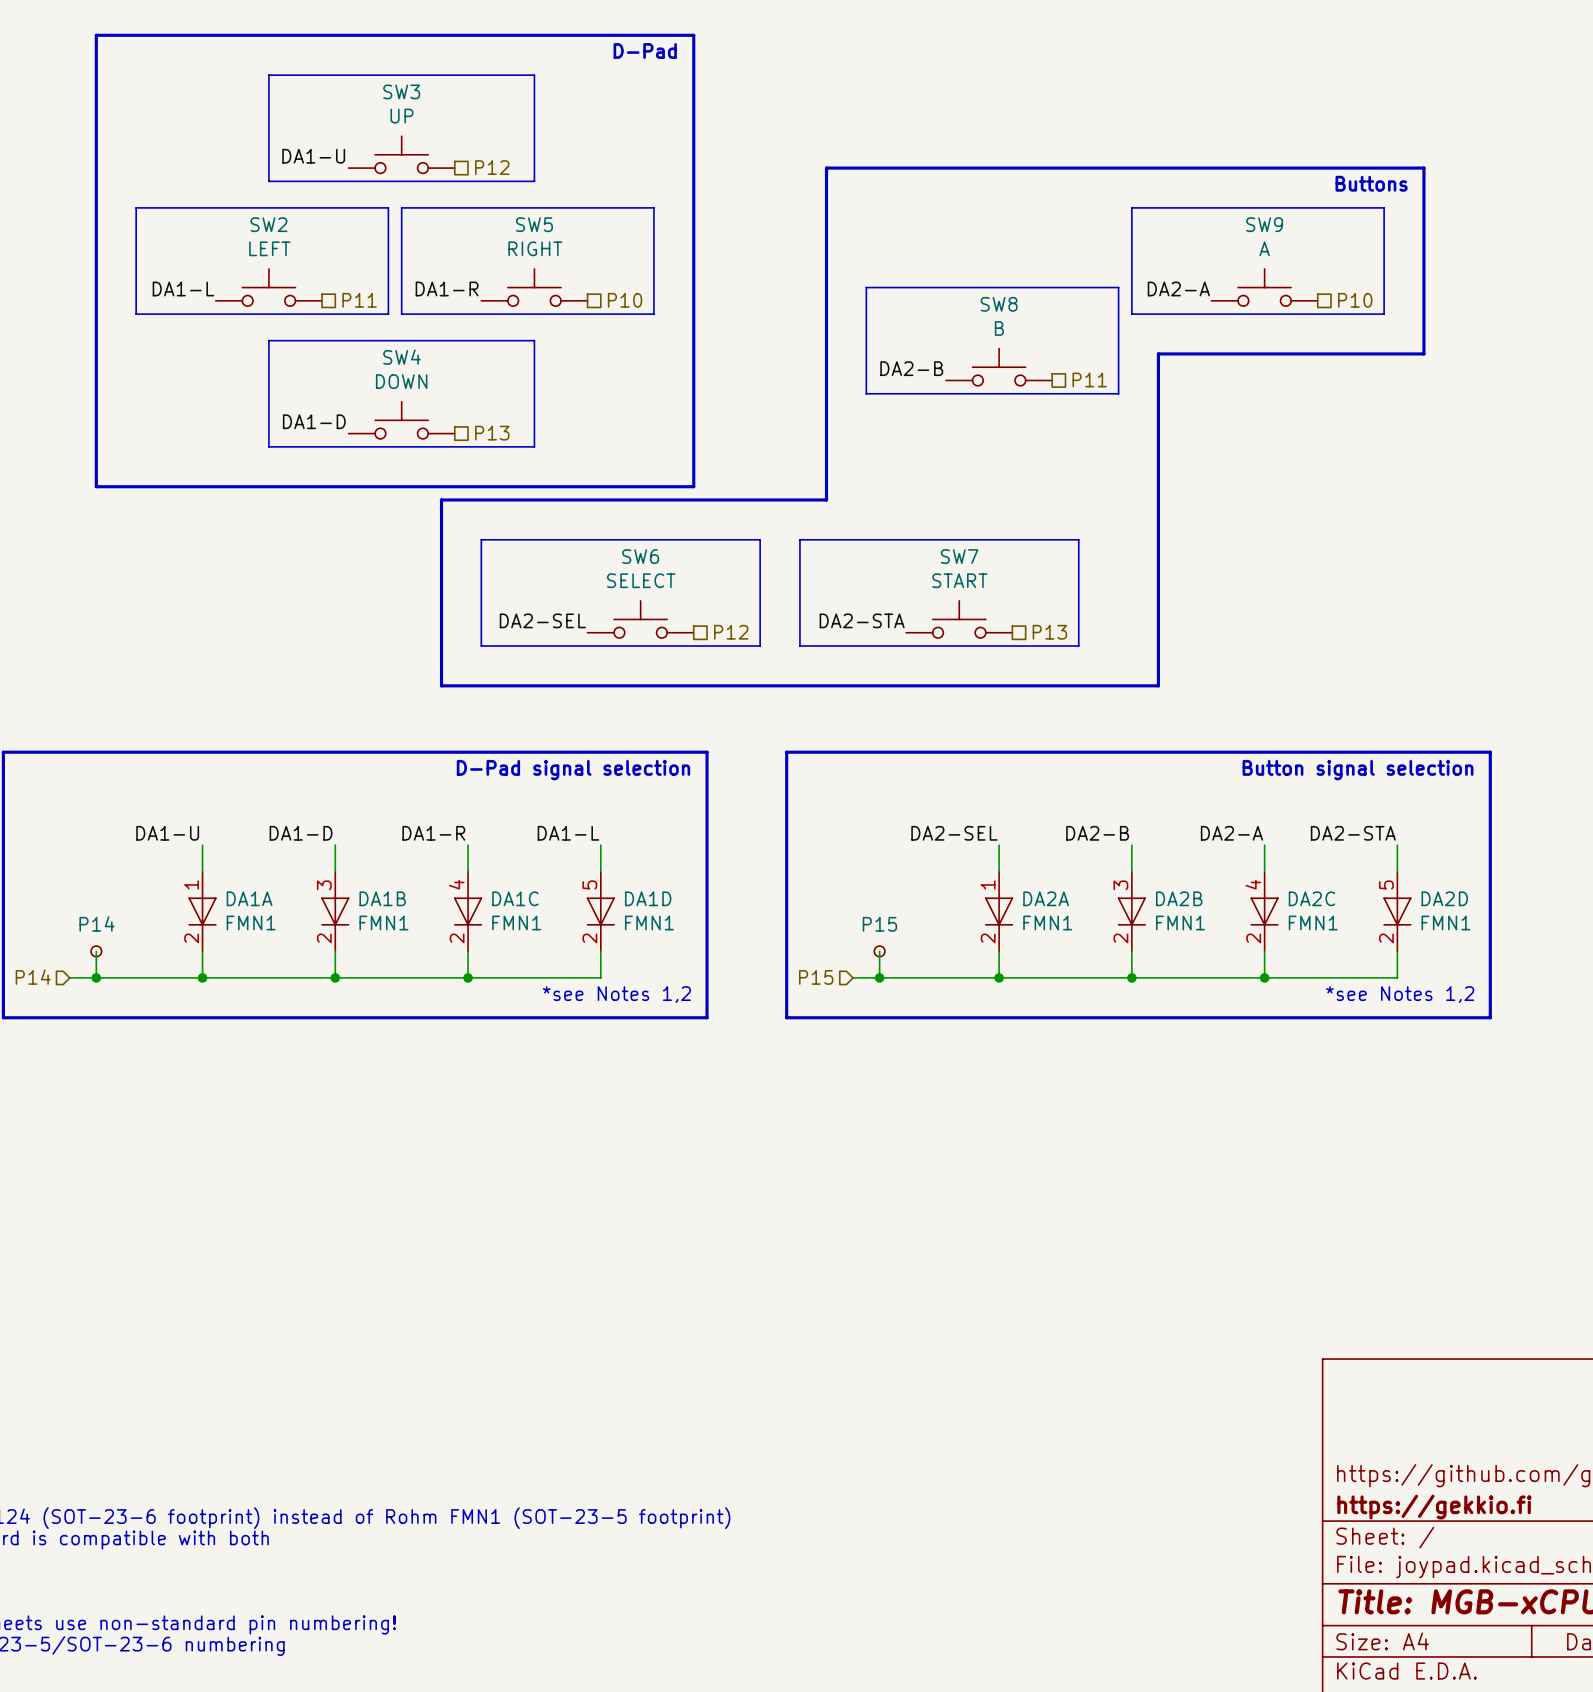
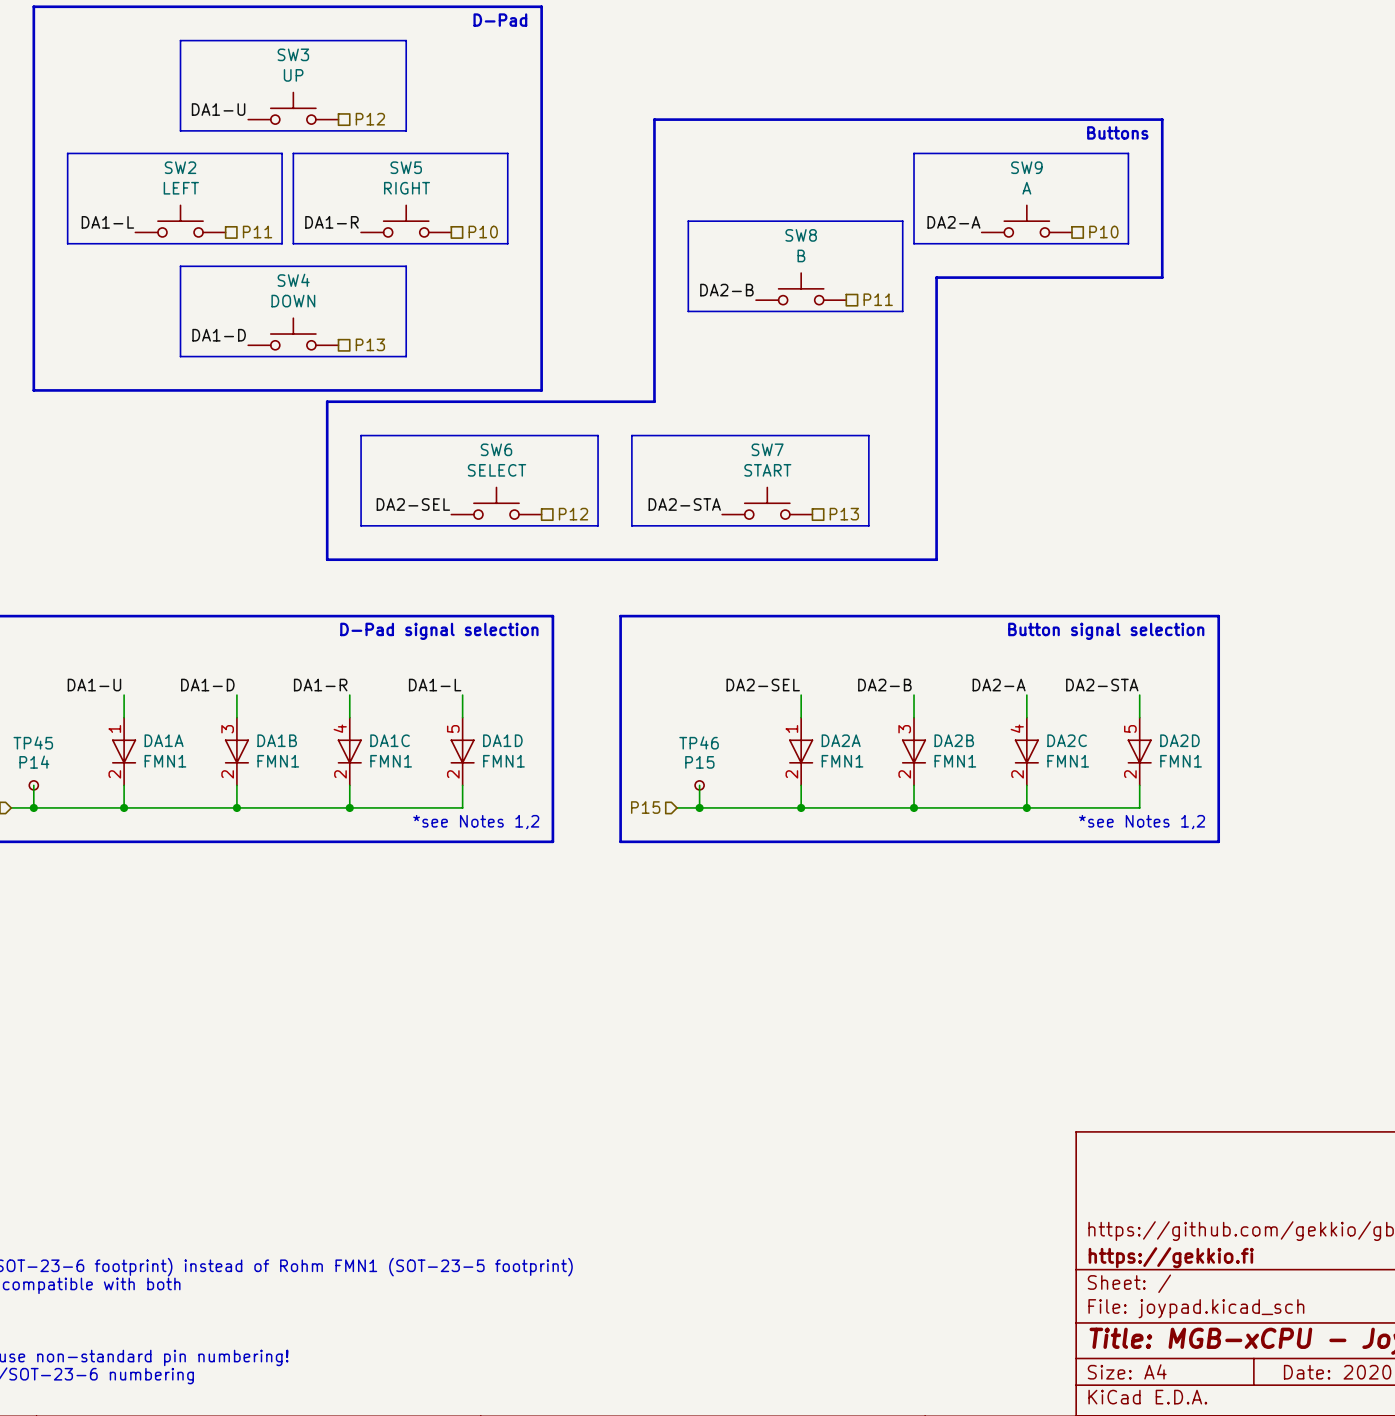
TP45 name: none -> TP45 (33, 742)
TP46 name: none -> TP46 (699, 742)

